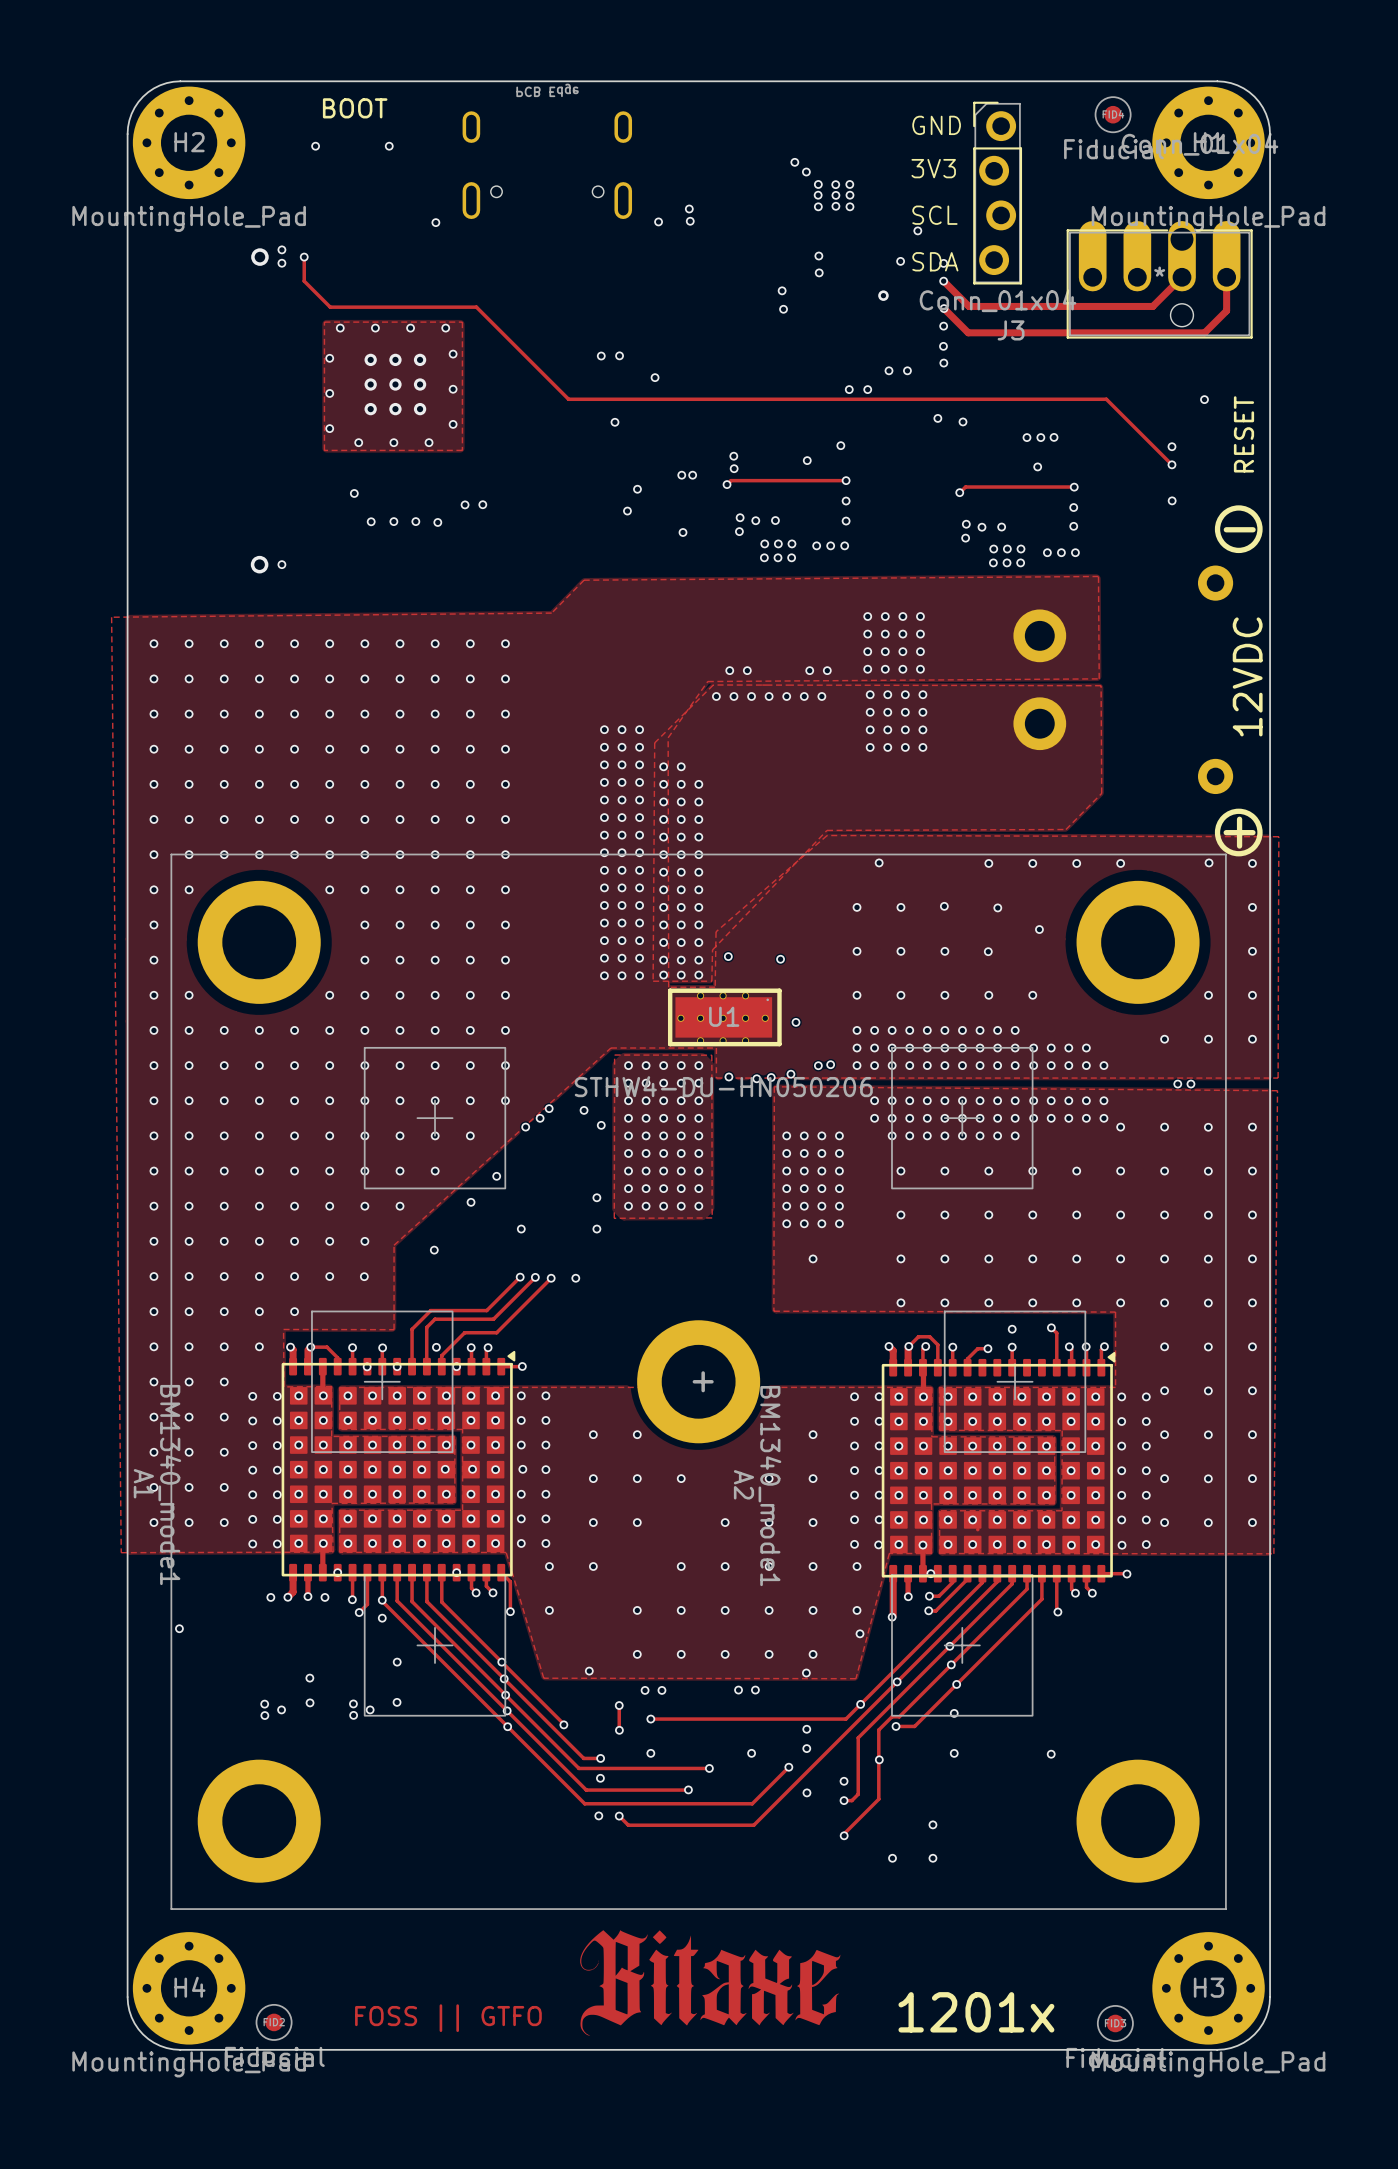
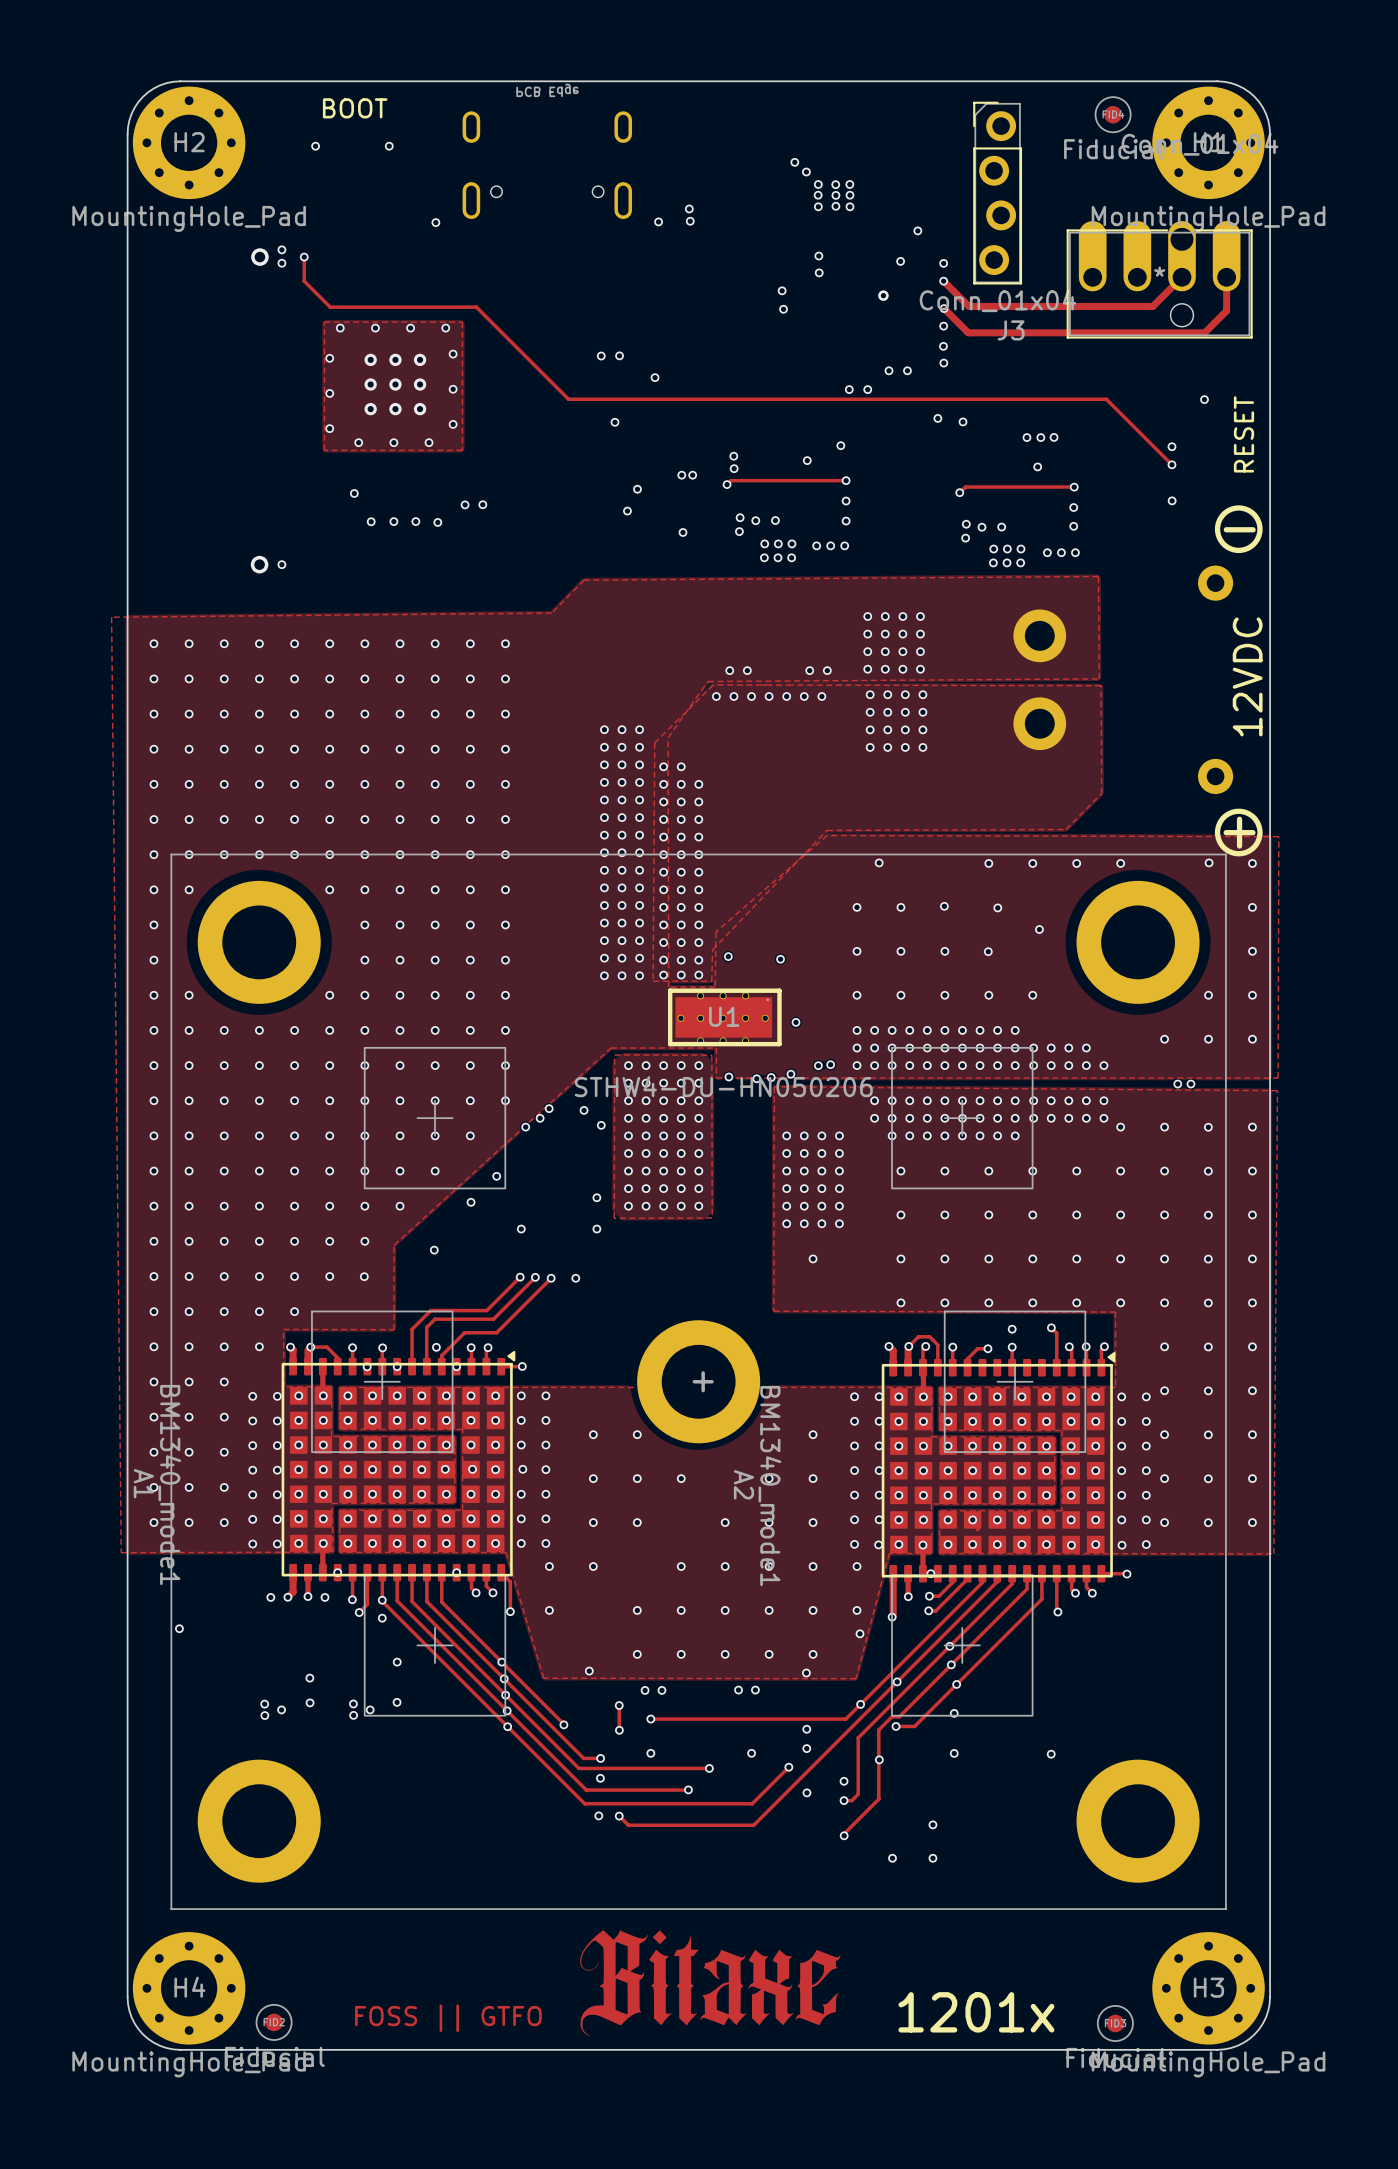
text: GND (936, 125) -> none
text: 3V3 (933, 168) -> none
text: SCL (934, 215) -> none
text: SDA (935, 261) -> none

